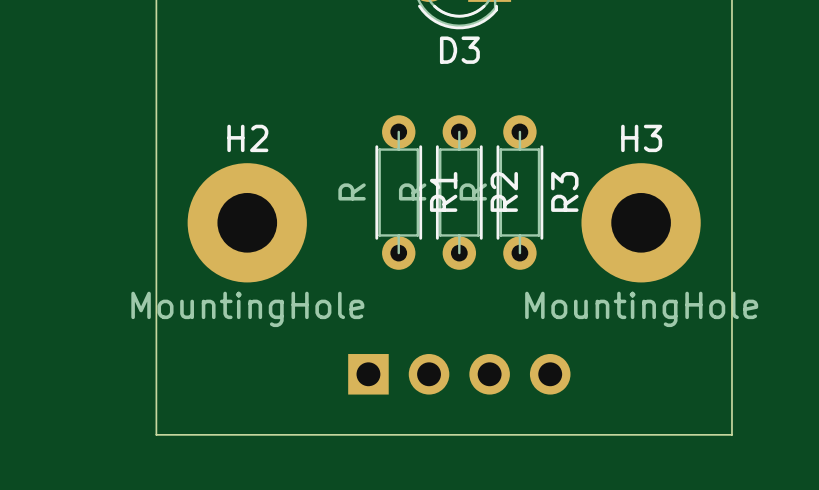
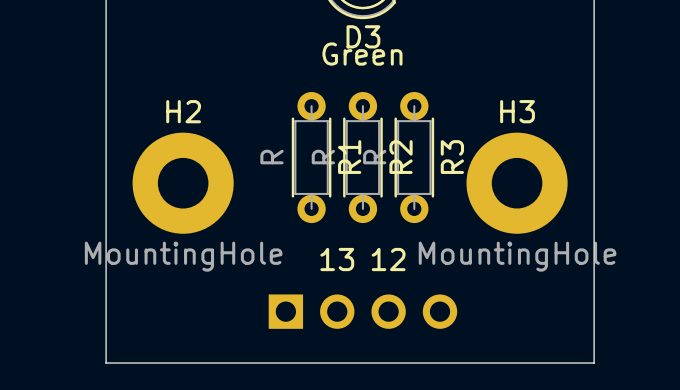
text: none -> Green (362, 54)
text: none -> 13 (337, 259)
text: none -> 12 (388, 259)

